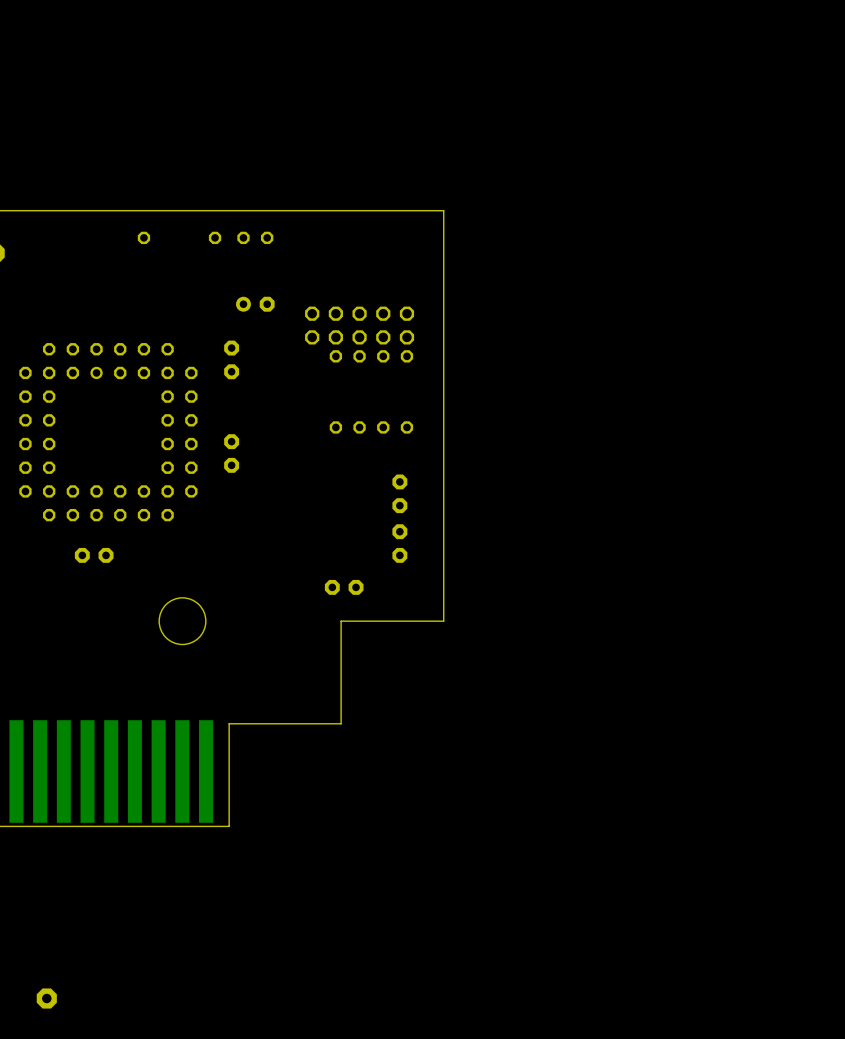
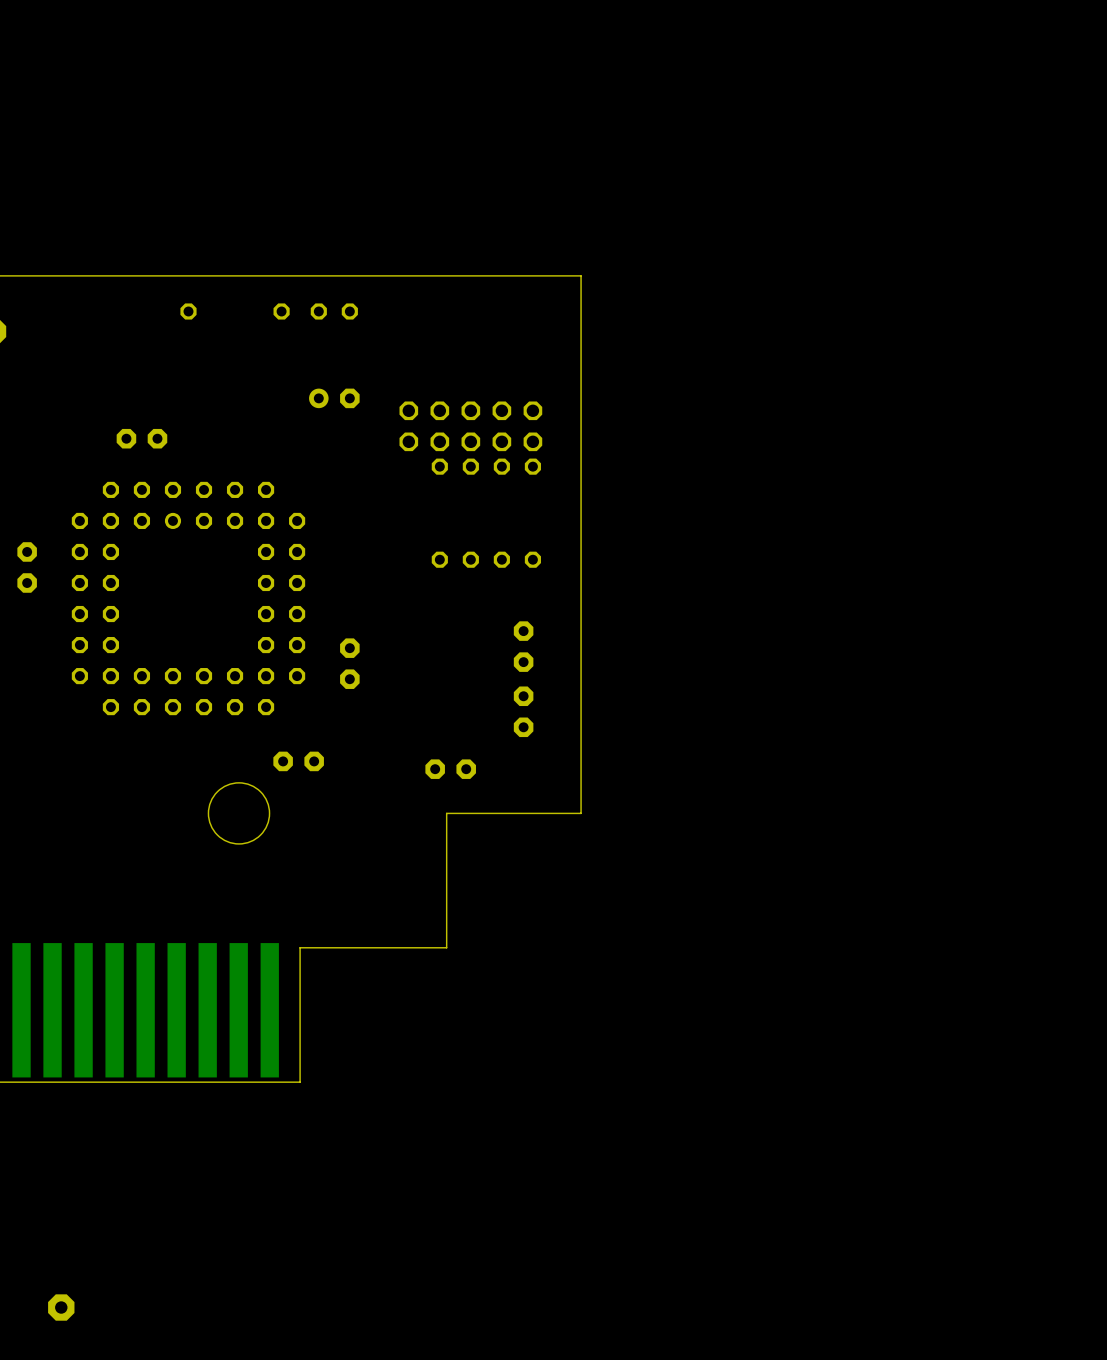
part: none -> (141, 438)
part: (231, 359) -> none
part position: (108, 432) -> (188, 598)
part: none -> (27, 567)
part: (231, 453) -> none
part: none -> (349, 663)
part: (94, 555) -> none
part: none -> (298, 761)

